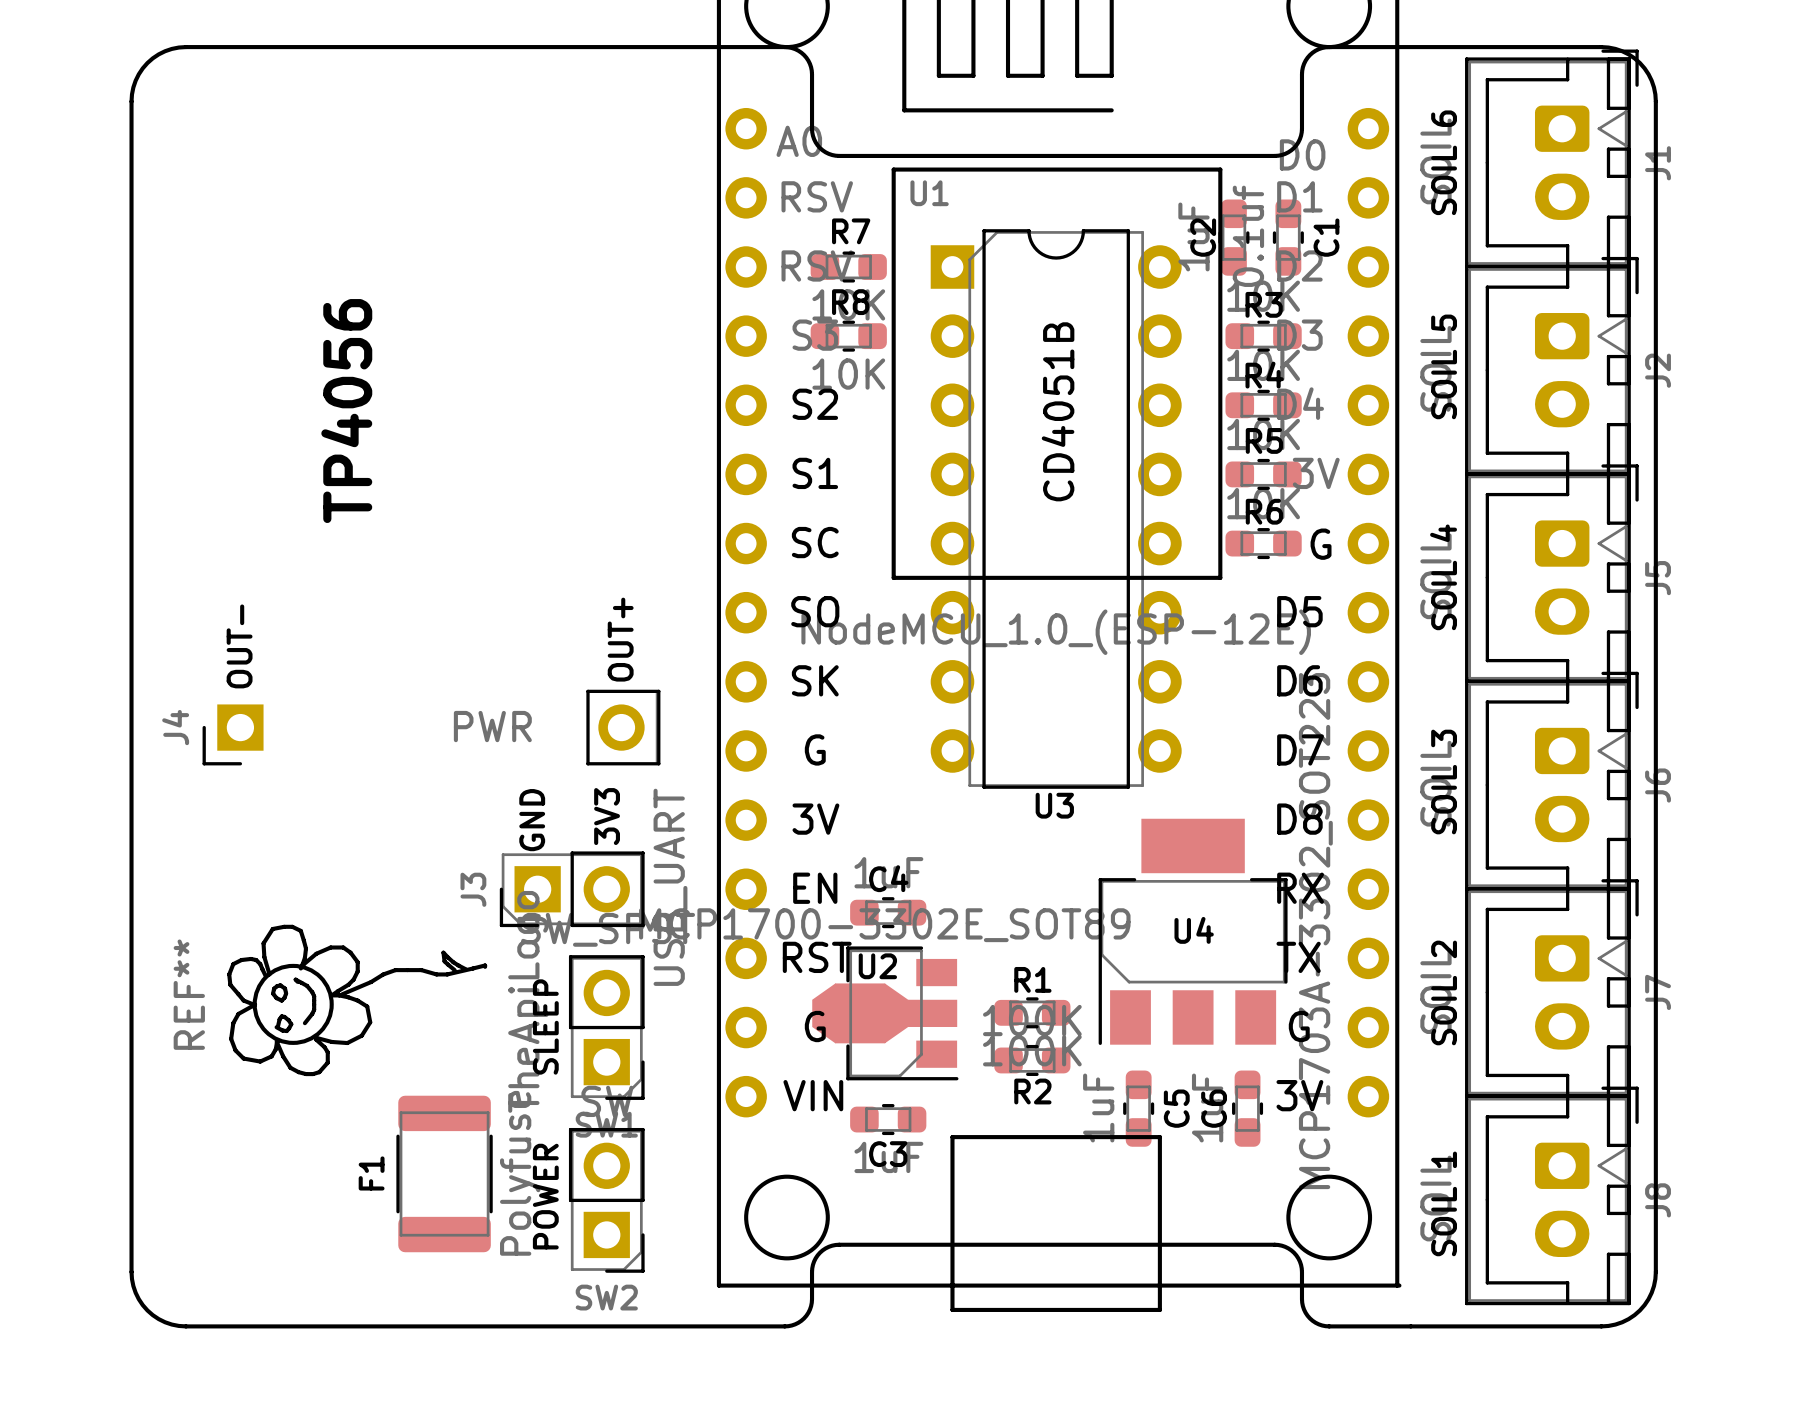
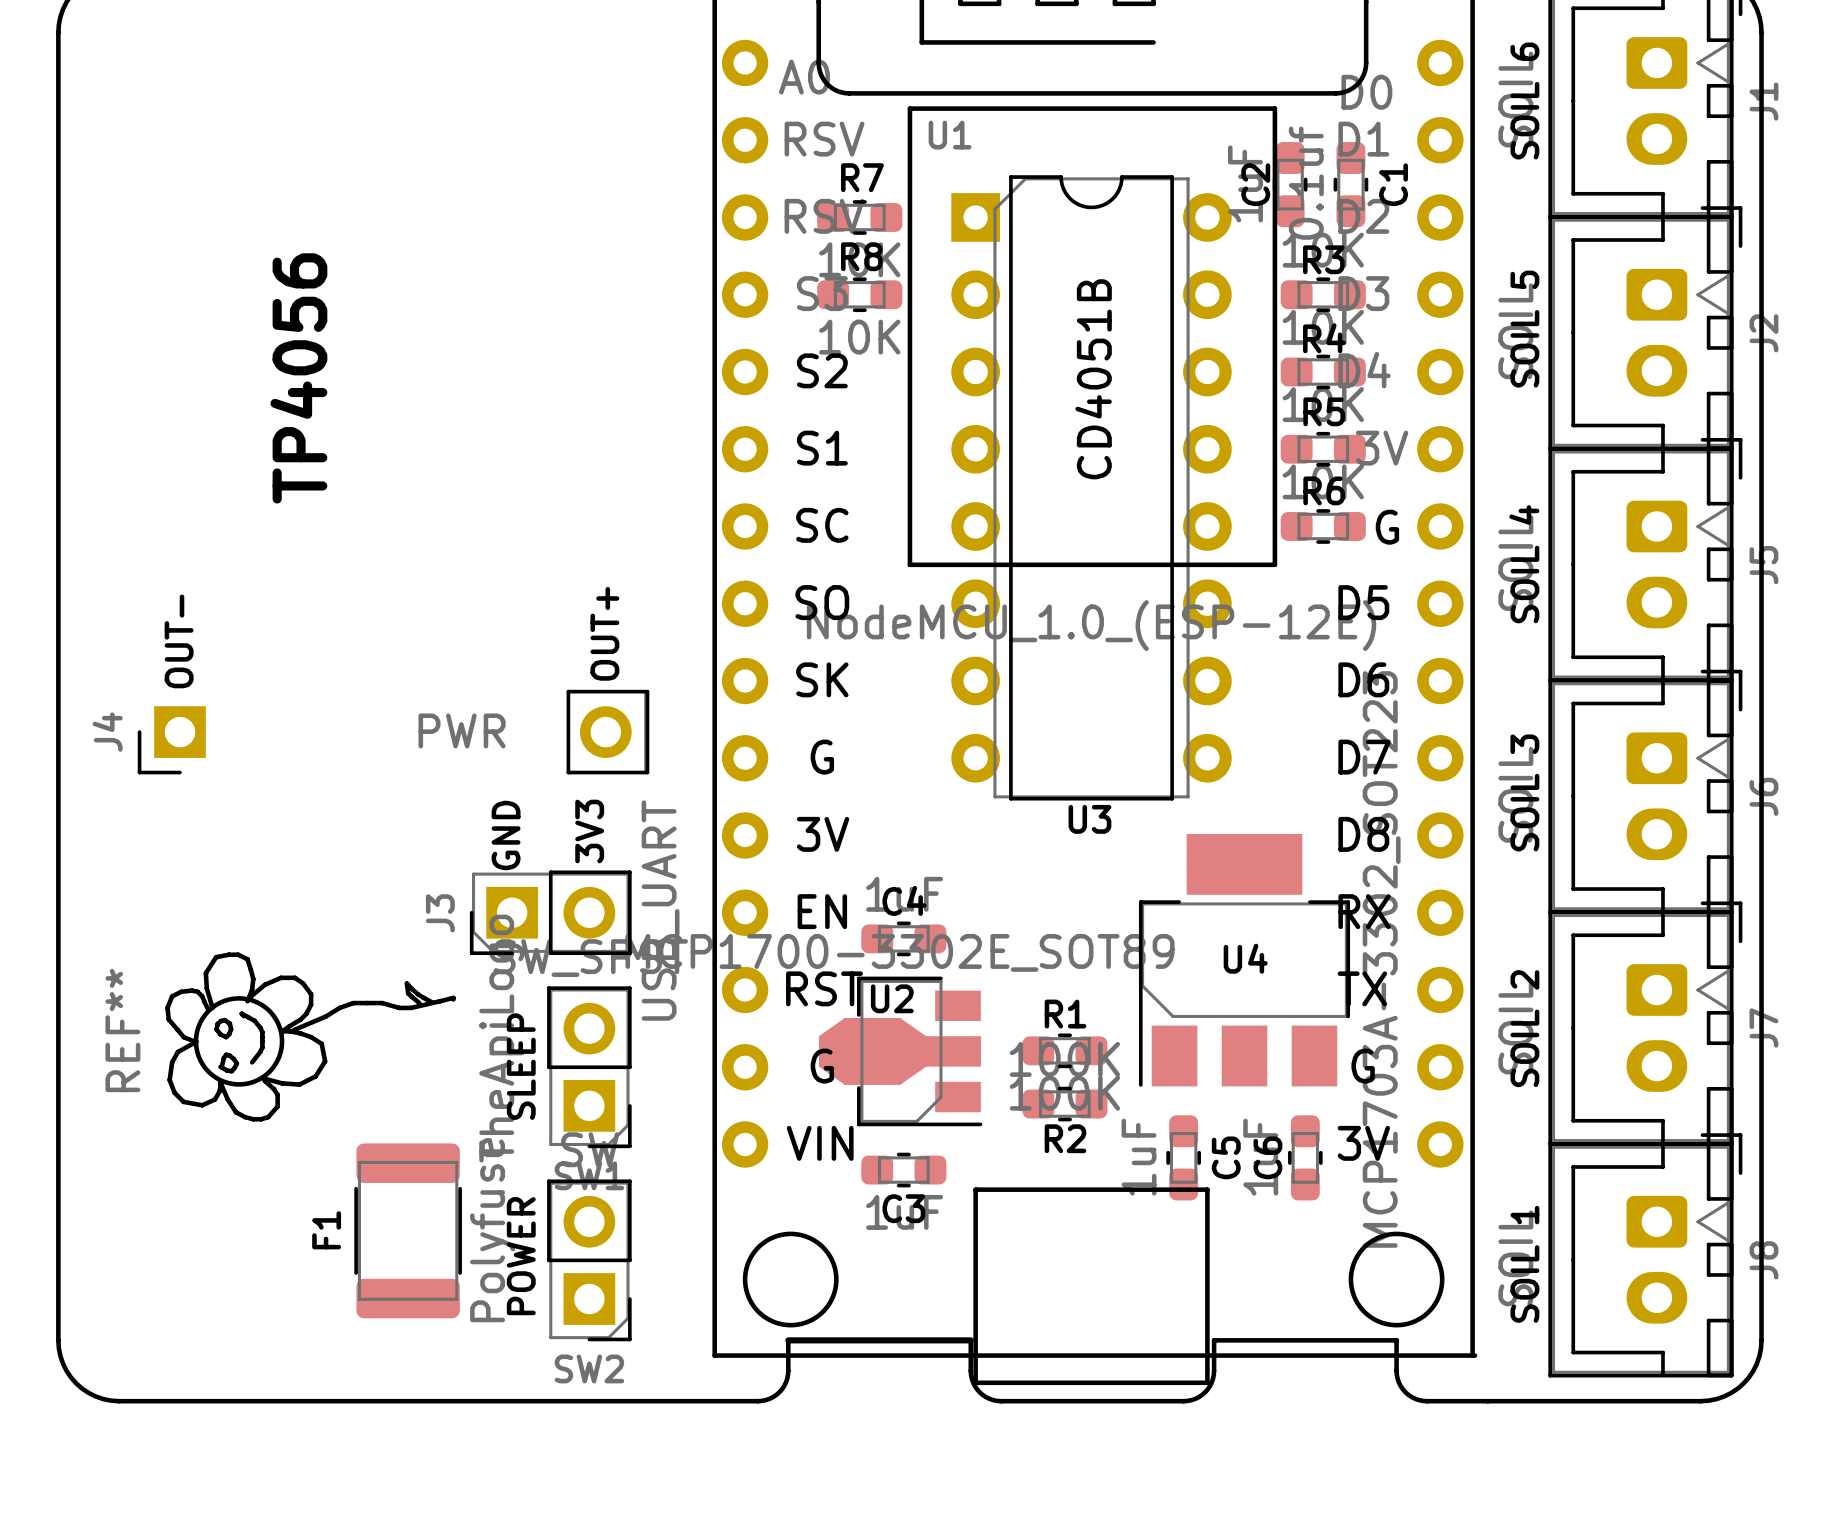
board edge: (757, 1326) (788, 1326) (804, 1318) (811, 1302) (814, 1261) (822, 1250) (839, 1244) (1278, 1244) (1291, 1250) (1299, 1261) (1302, 1302) (1309, 1318) (1325, 1326) (1356, 1326) -> (757, 1401) (773, 1397) (784, 1385) (788, 1374) (788, 1340) (970, 1340) (971, 1374) (974, 1385) (985, 1397) (1001, 1401) (1187, 1400) (1202, 1394) (1211, 1382) (1214, 1370) (1214, 1340) (1396, 1340) (1396, 1374) (1400, 1385) (1411, 1397) (1426, 1401)

